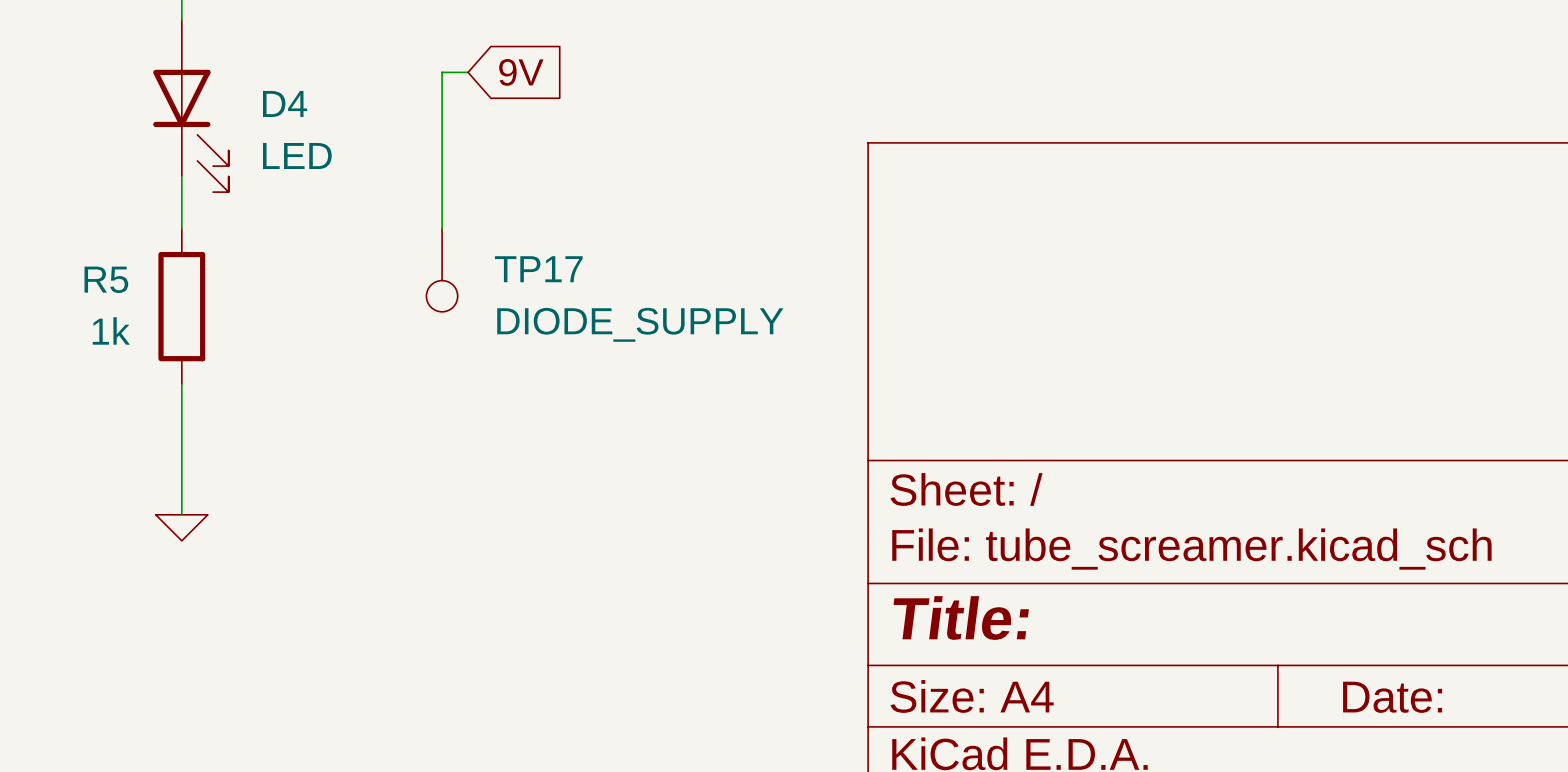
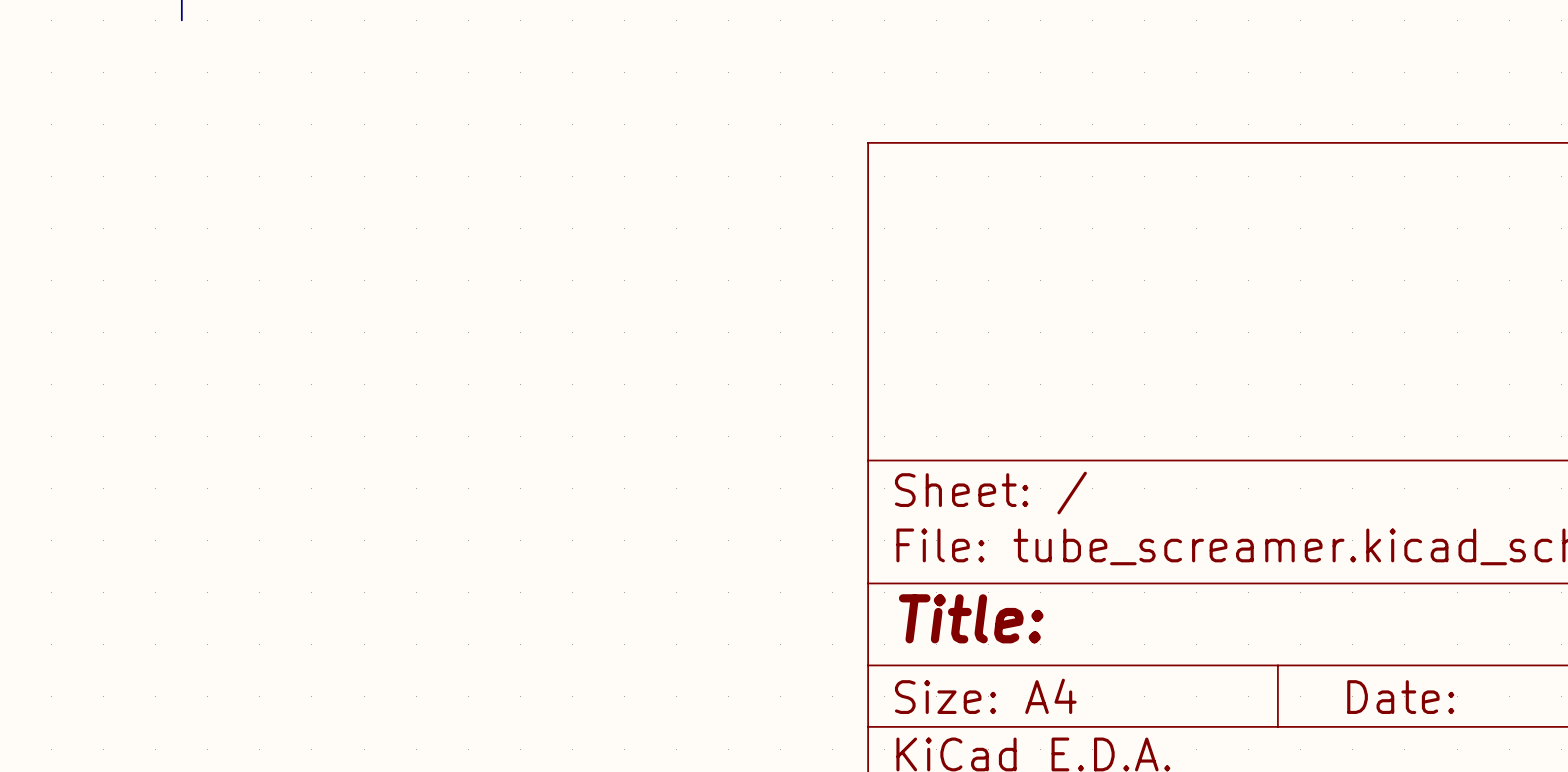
wire: (468, 72) (442, 72) (442, 228) -> none
global label: 9V (521, 72) -> none
D4: LED (190, 106) -> none
wire: (181, 176) (181, 228) -> none
TP17: DIODE_SUPPLY (442, 270) -> none
R5: 1k (181, 306) -> none
wire: (181, 384) (181, 514) -> none
power symbol: (181, 527) -> none

